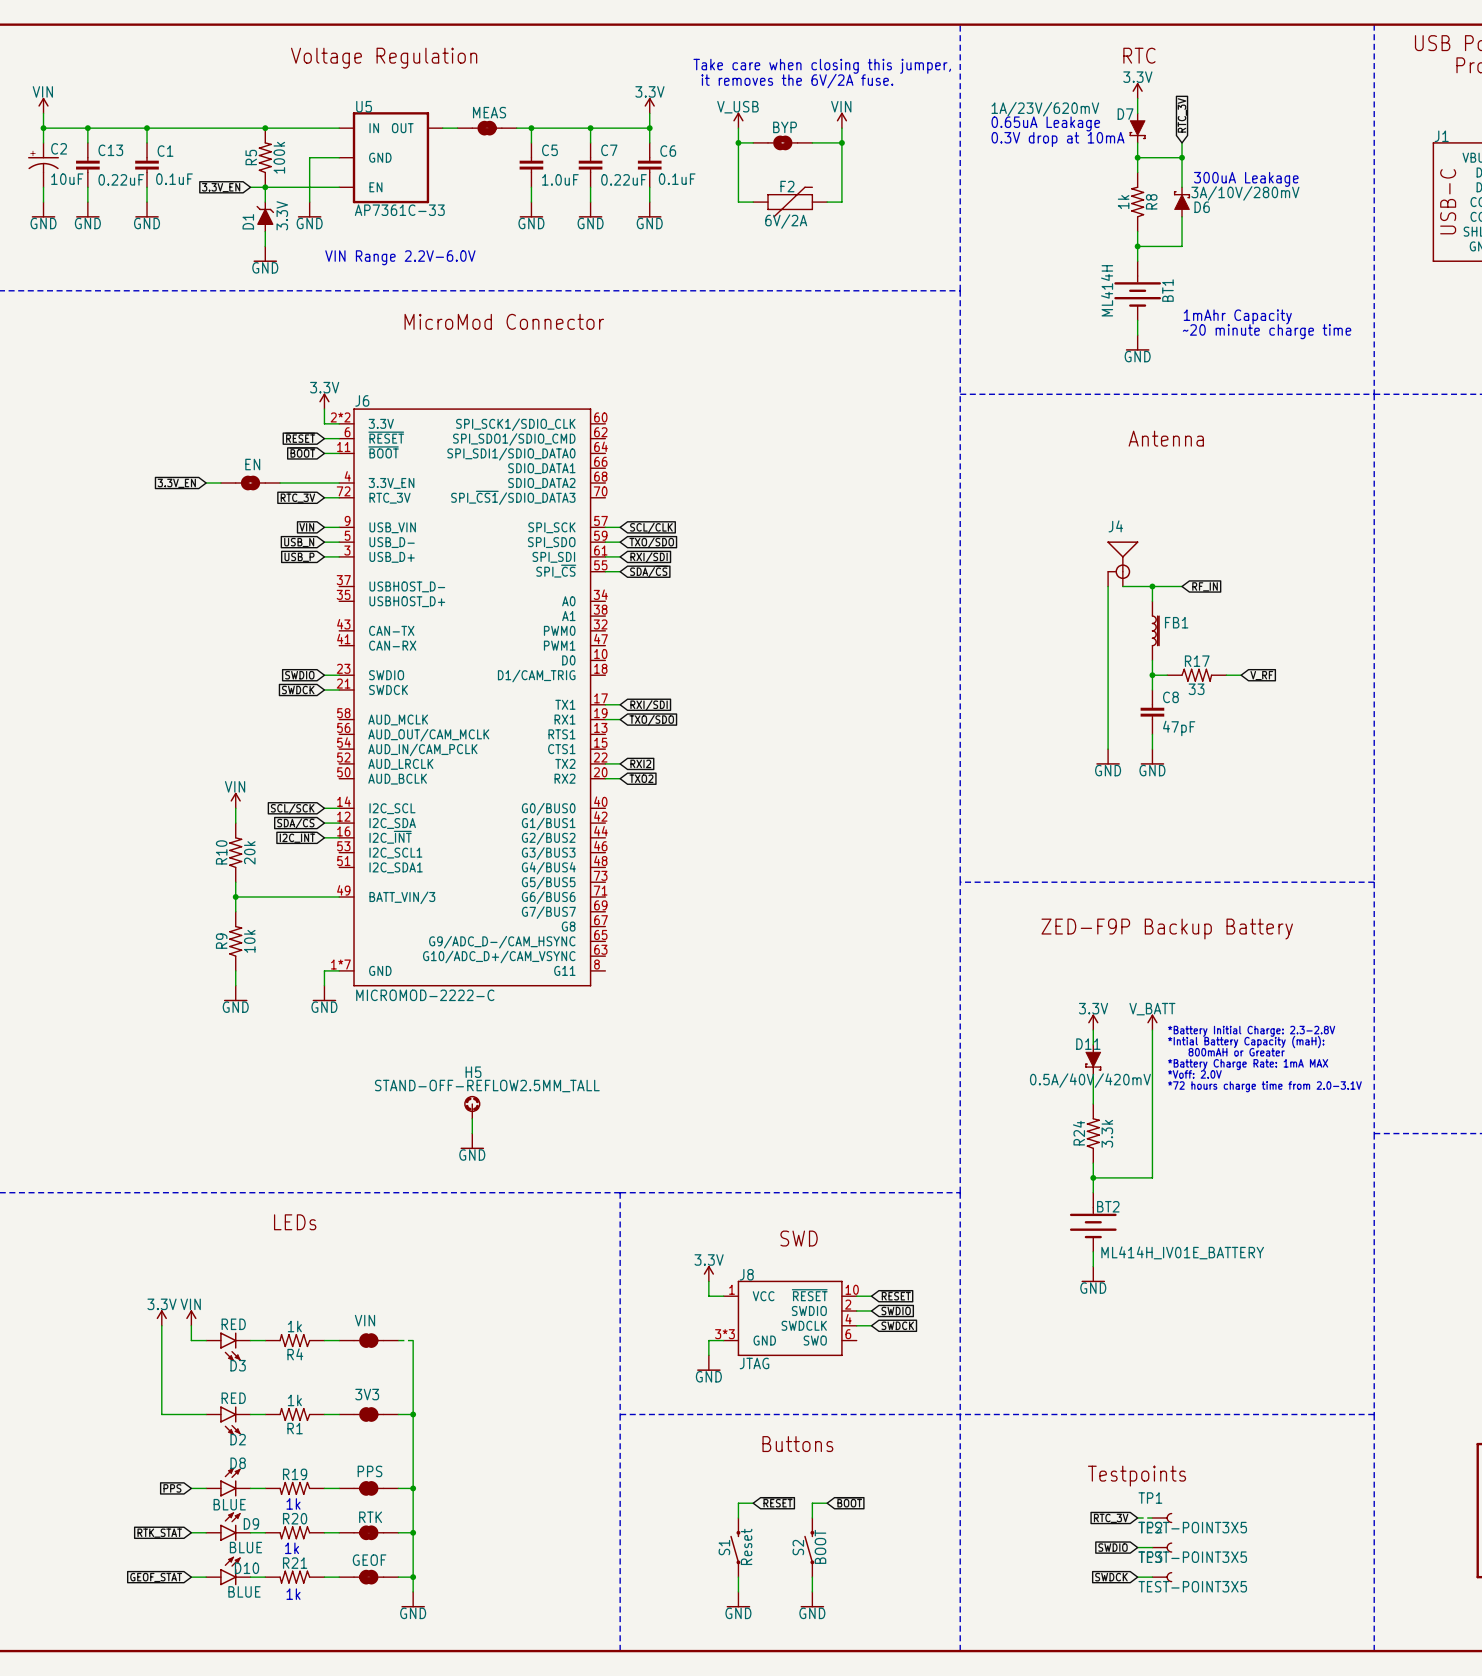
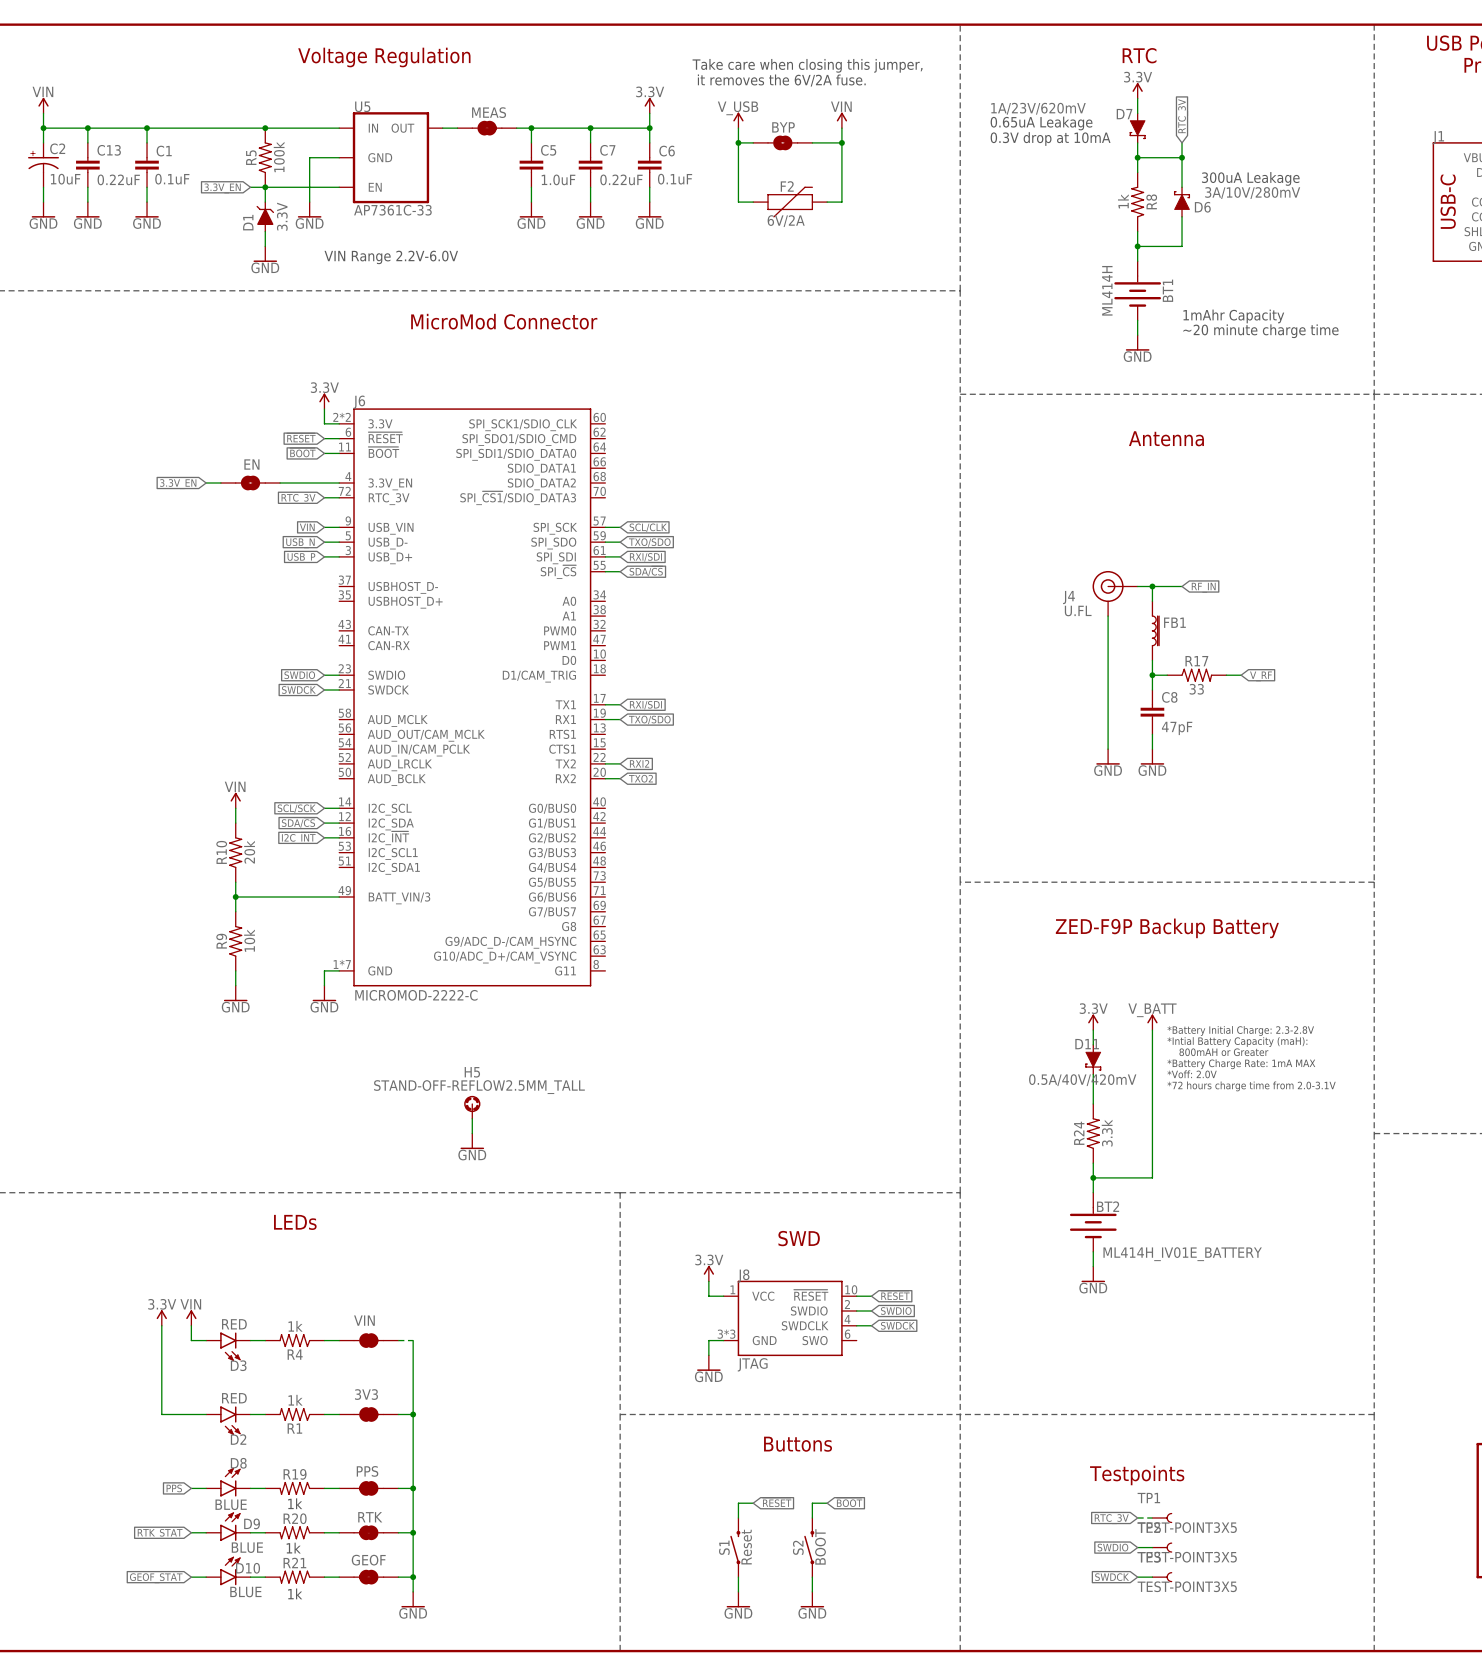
J4 name position: J4 (1115, 526) -> J4 (1068, 597)
J4 symbol: [1107, 541, 1139, 587] -> [1092, 570, 1138, 617]
J4 value: none -> U.FL (1078, 610)

